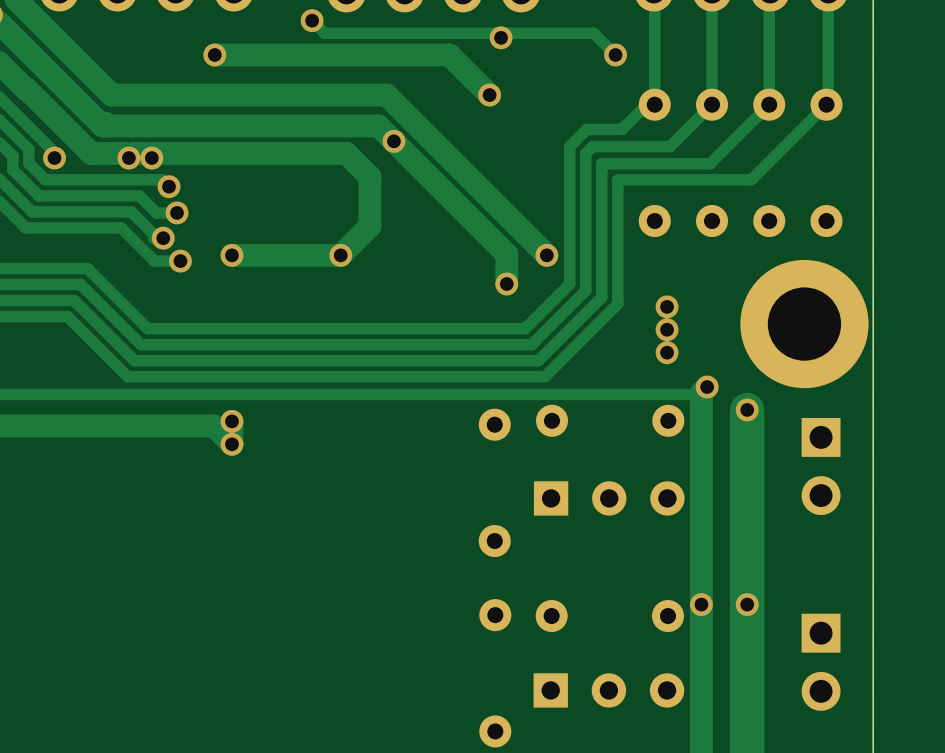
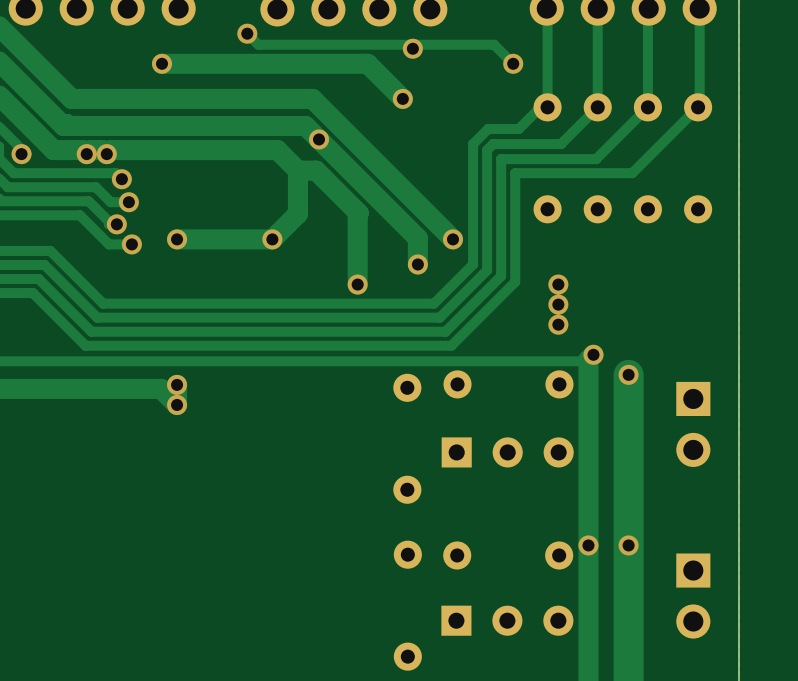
track: none -> (297, 170) (316, 170) (358, 213) (357, 284)
via: none -> (357, 284)
part: (804, 324) -> none

